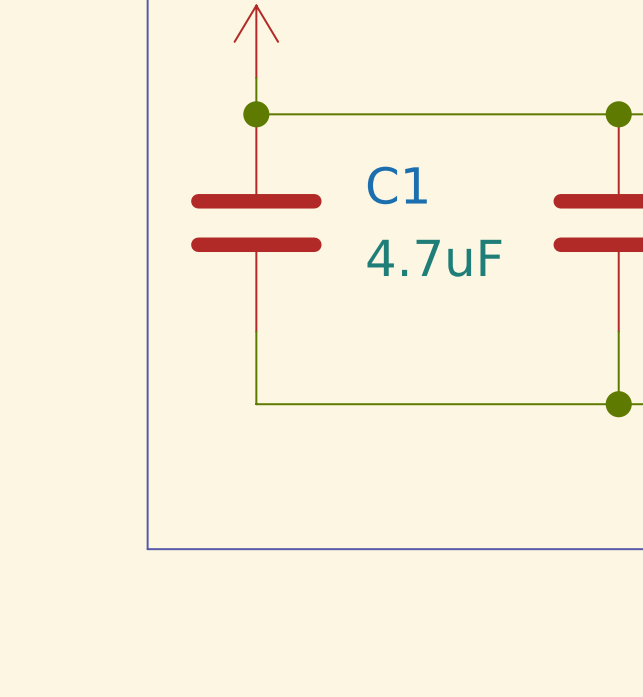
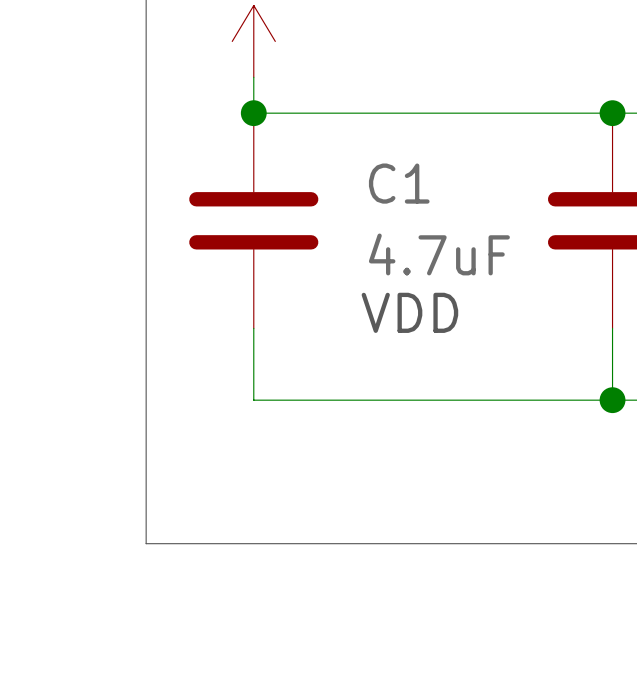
text: none -> VDD (409, 312)

